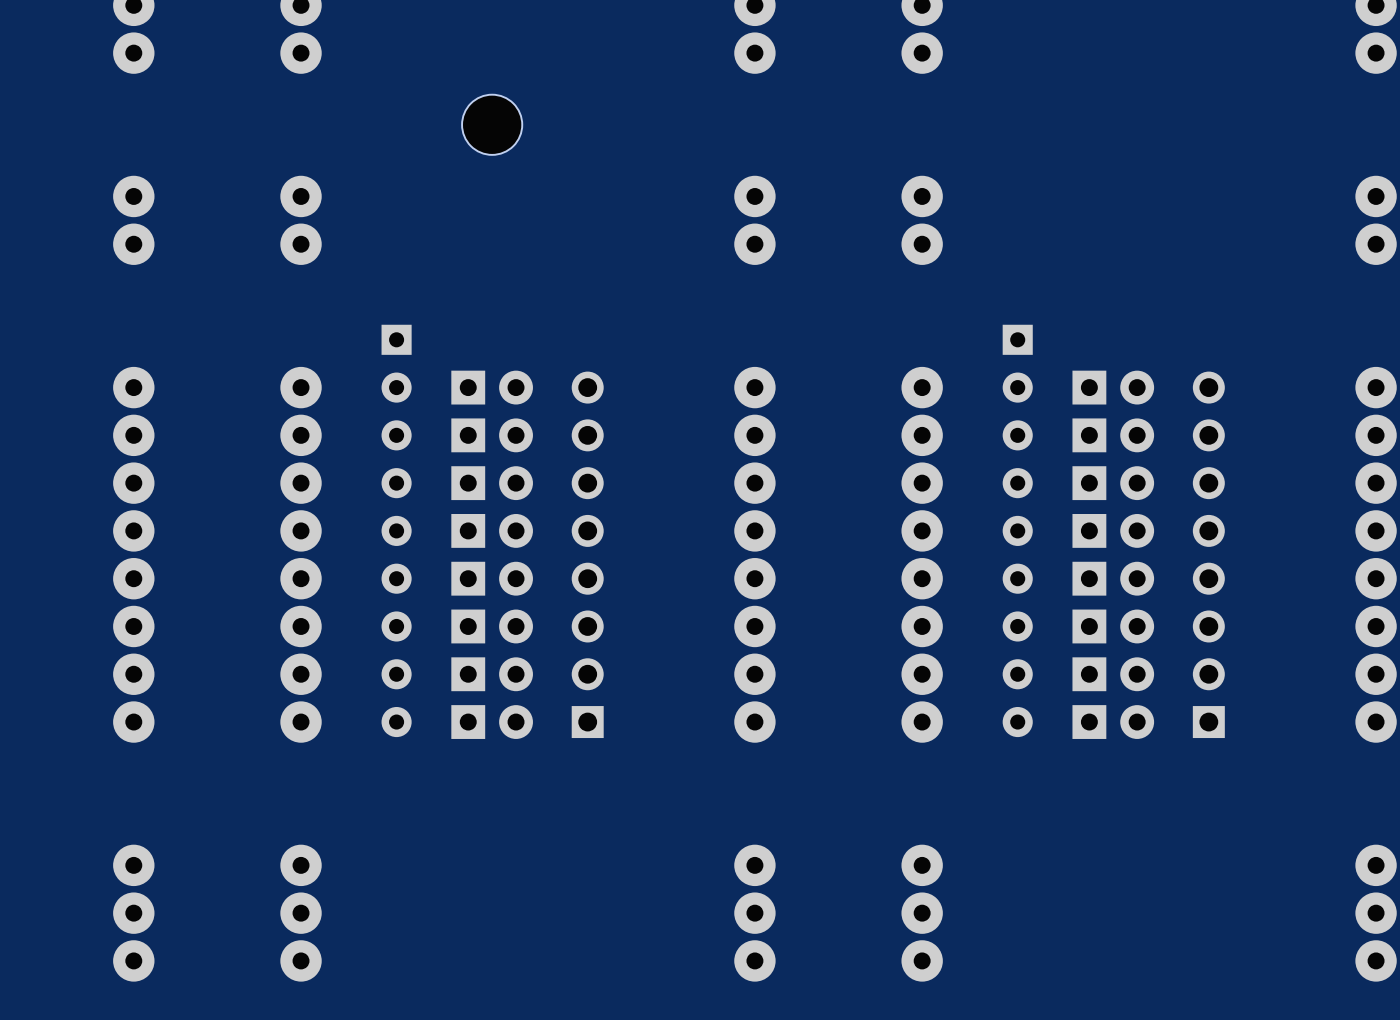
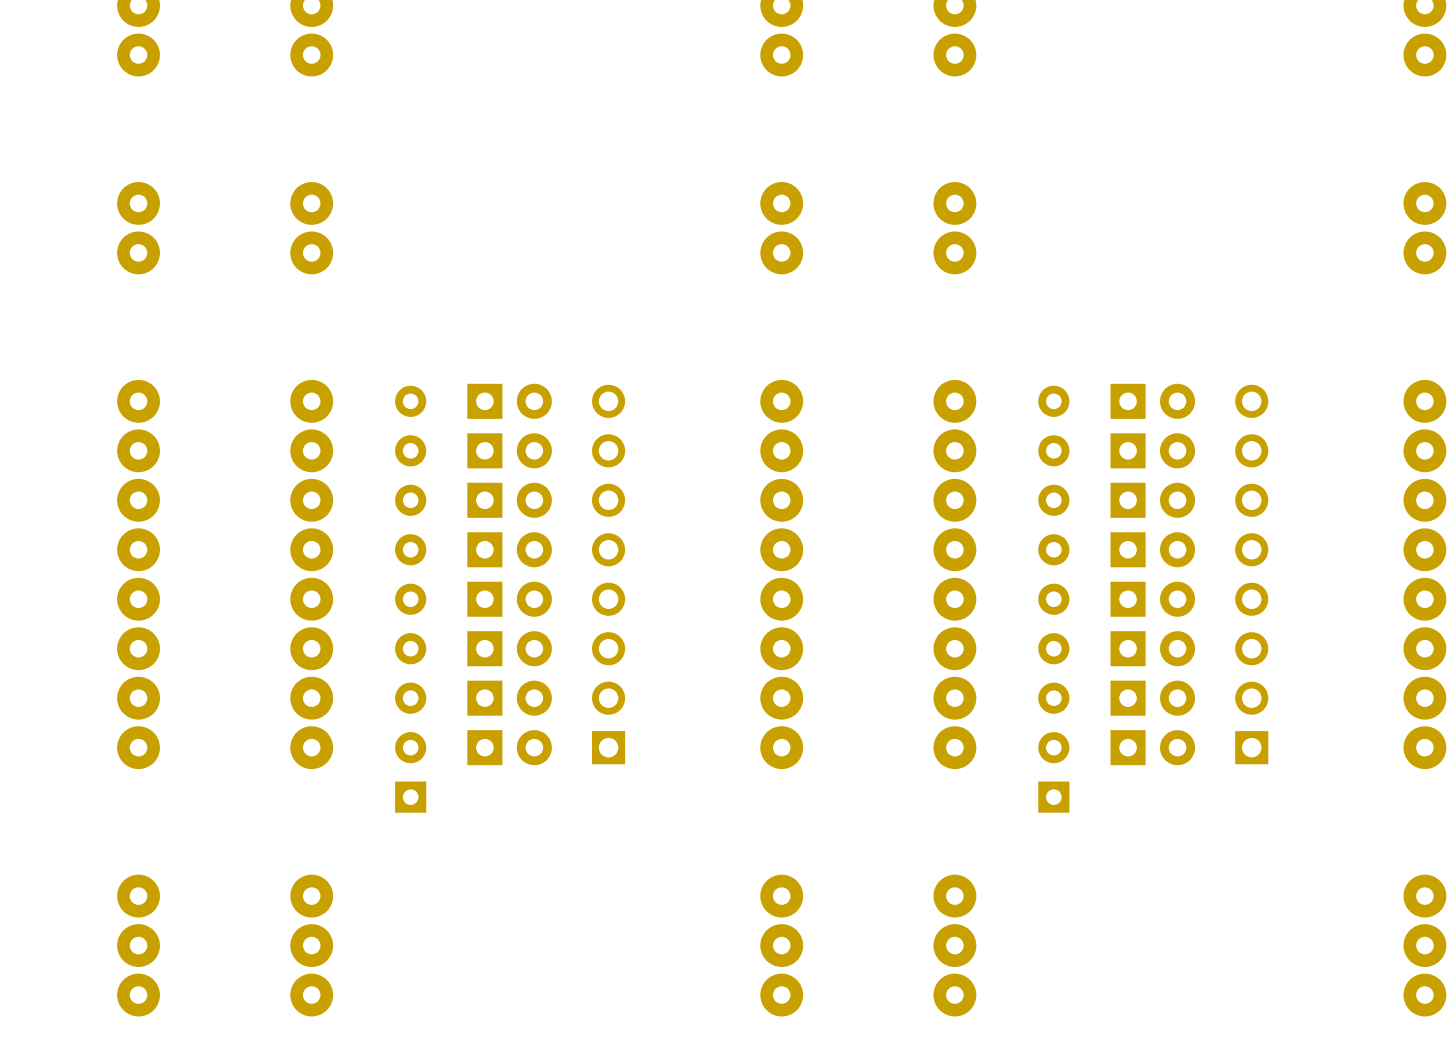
part: (492, 124) -> none
part rotation: 0° (396, 530) -> 180° (410, 599)
part rotation: 0° (1017, 530) -> 180° (1053, 599)

